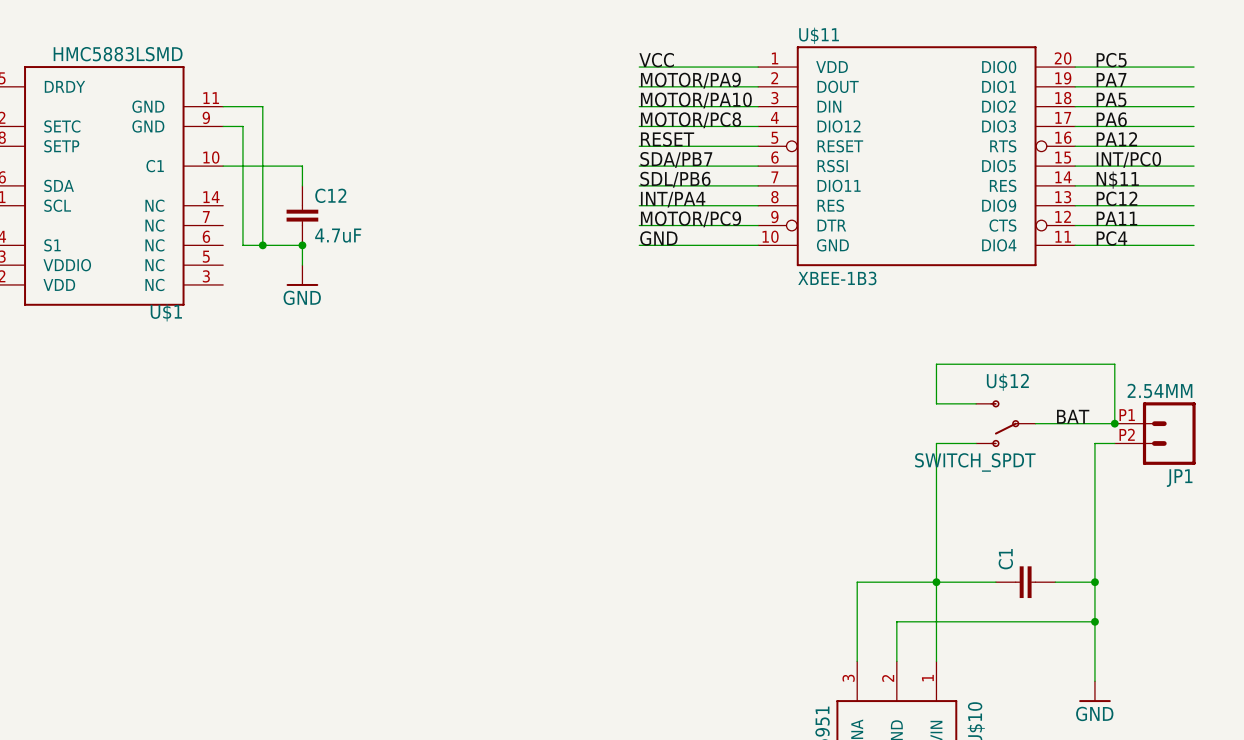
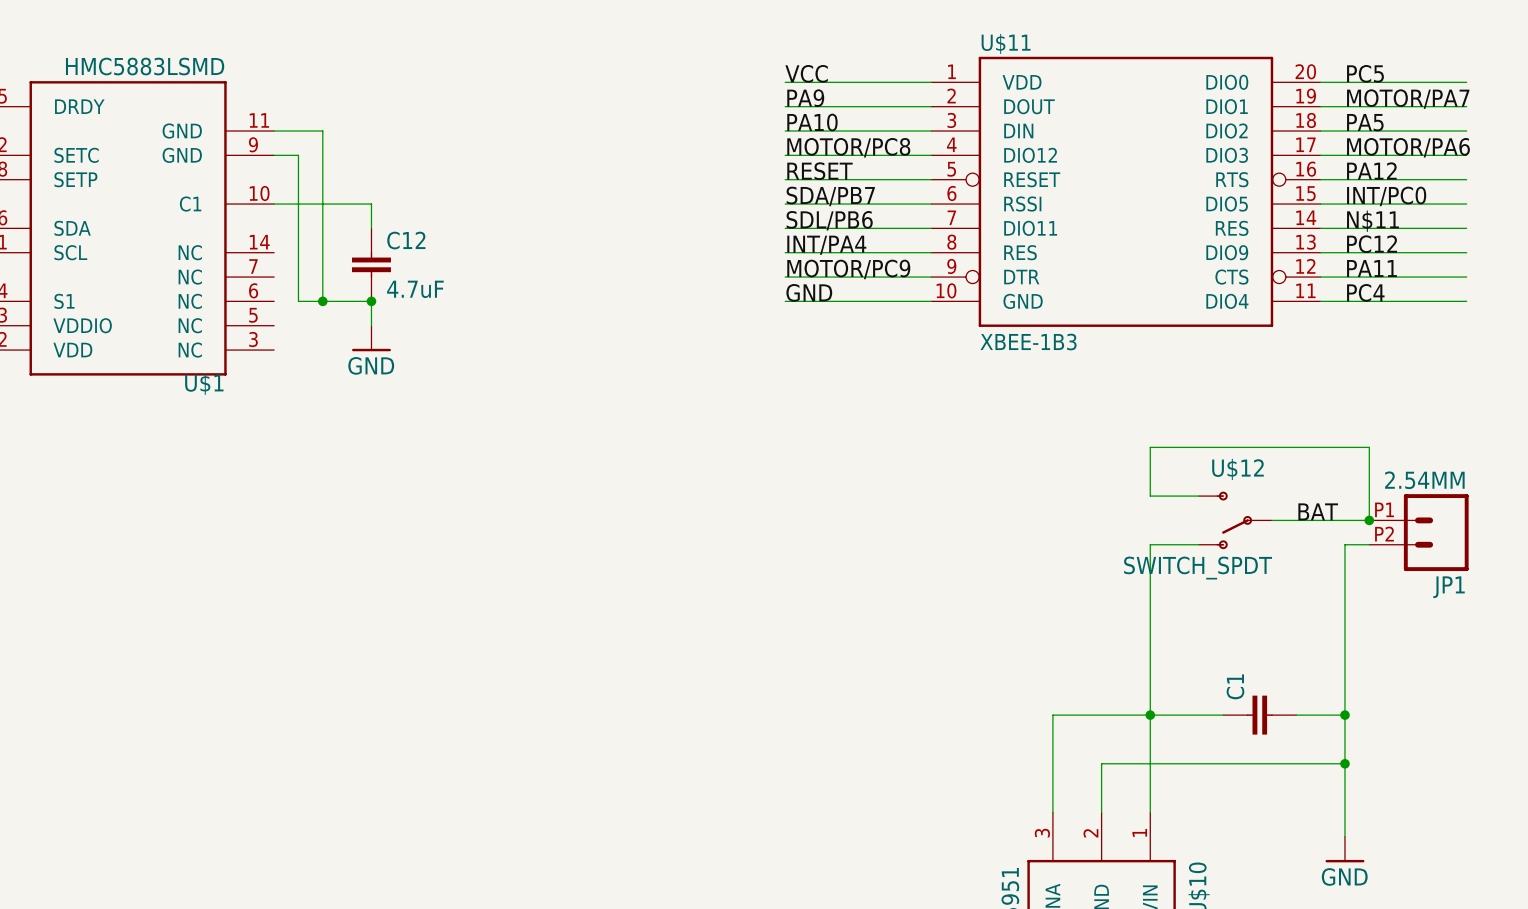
label: PA7 (1111, 79) -> MOTOR/PA7 (1408, 99)
label: MOTOR/PA9 (690, 80) -> PA9 (805, 98)
label: MOTOR/PA10 (696, 100) -> PA10 (812, 122)
label: PA6 (1111, 119) -> MOTOR/PA6 (1408, 147)

